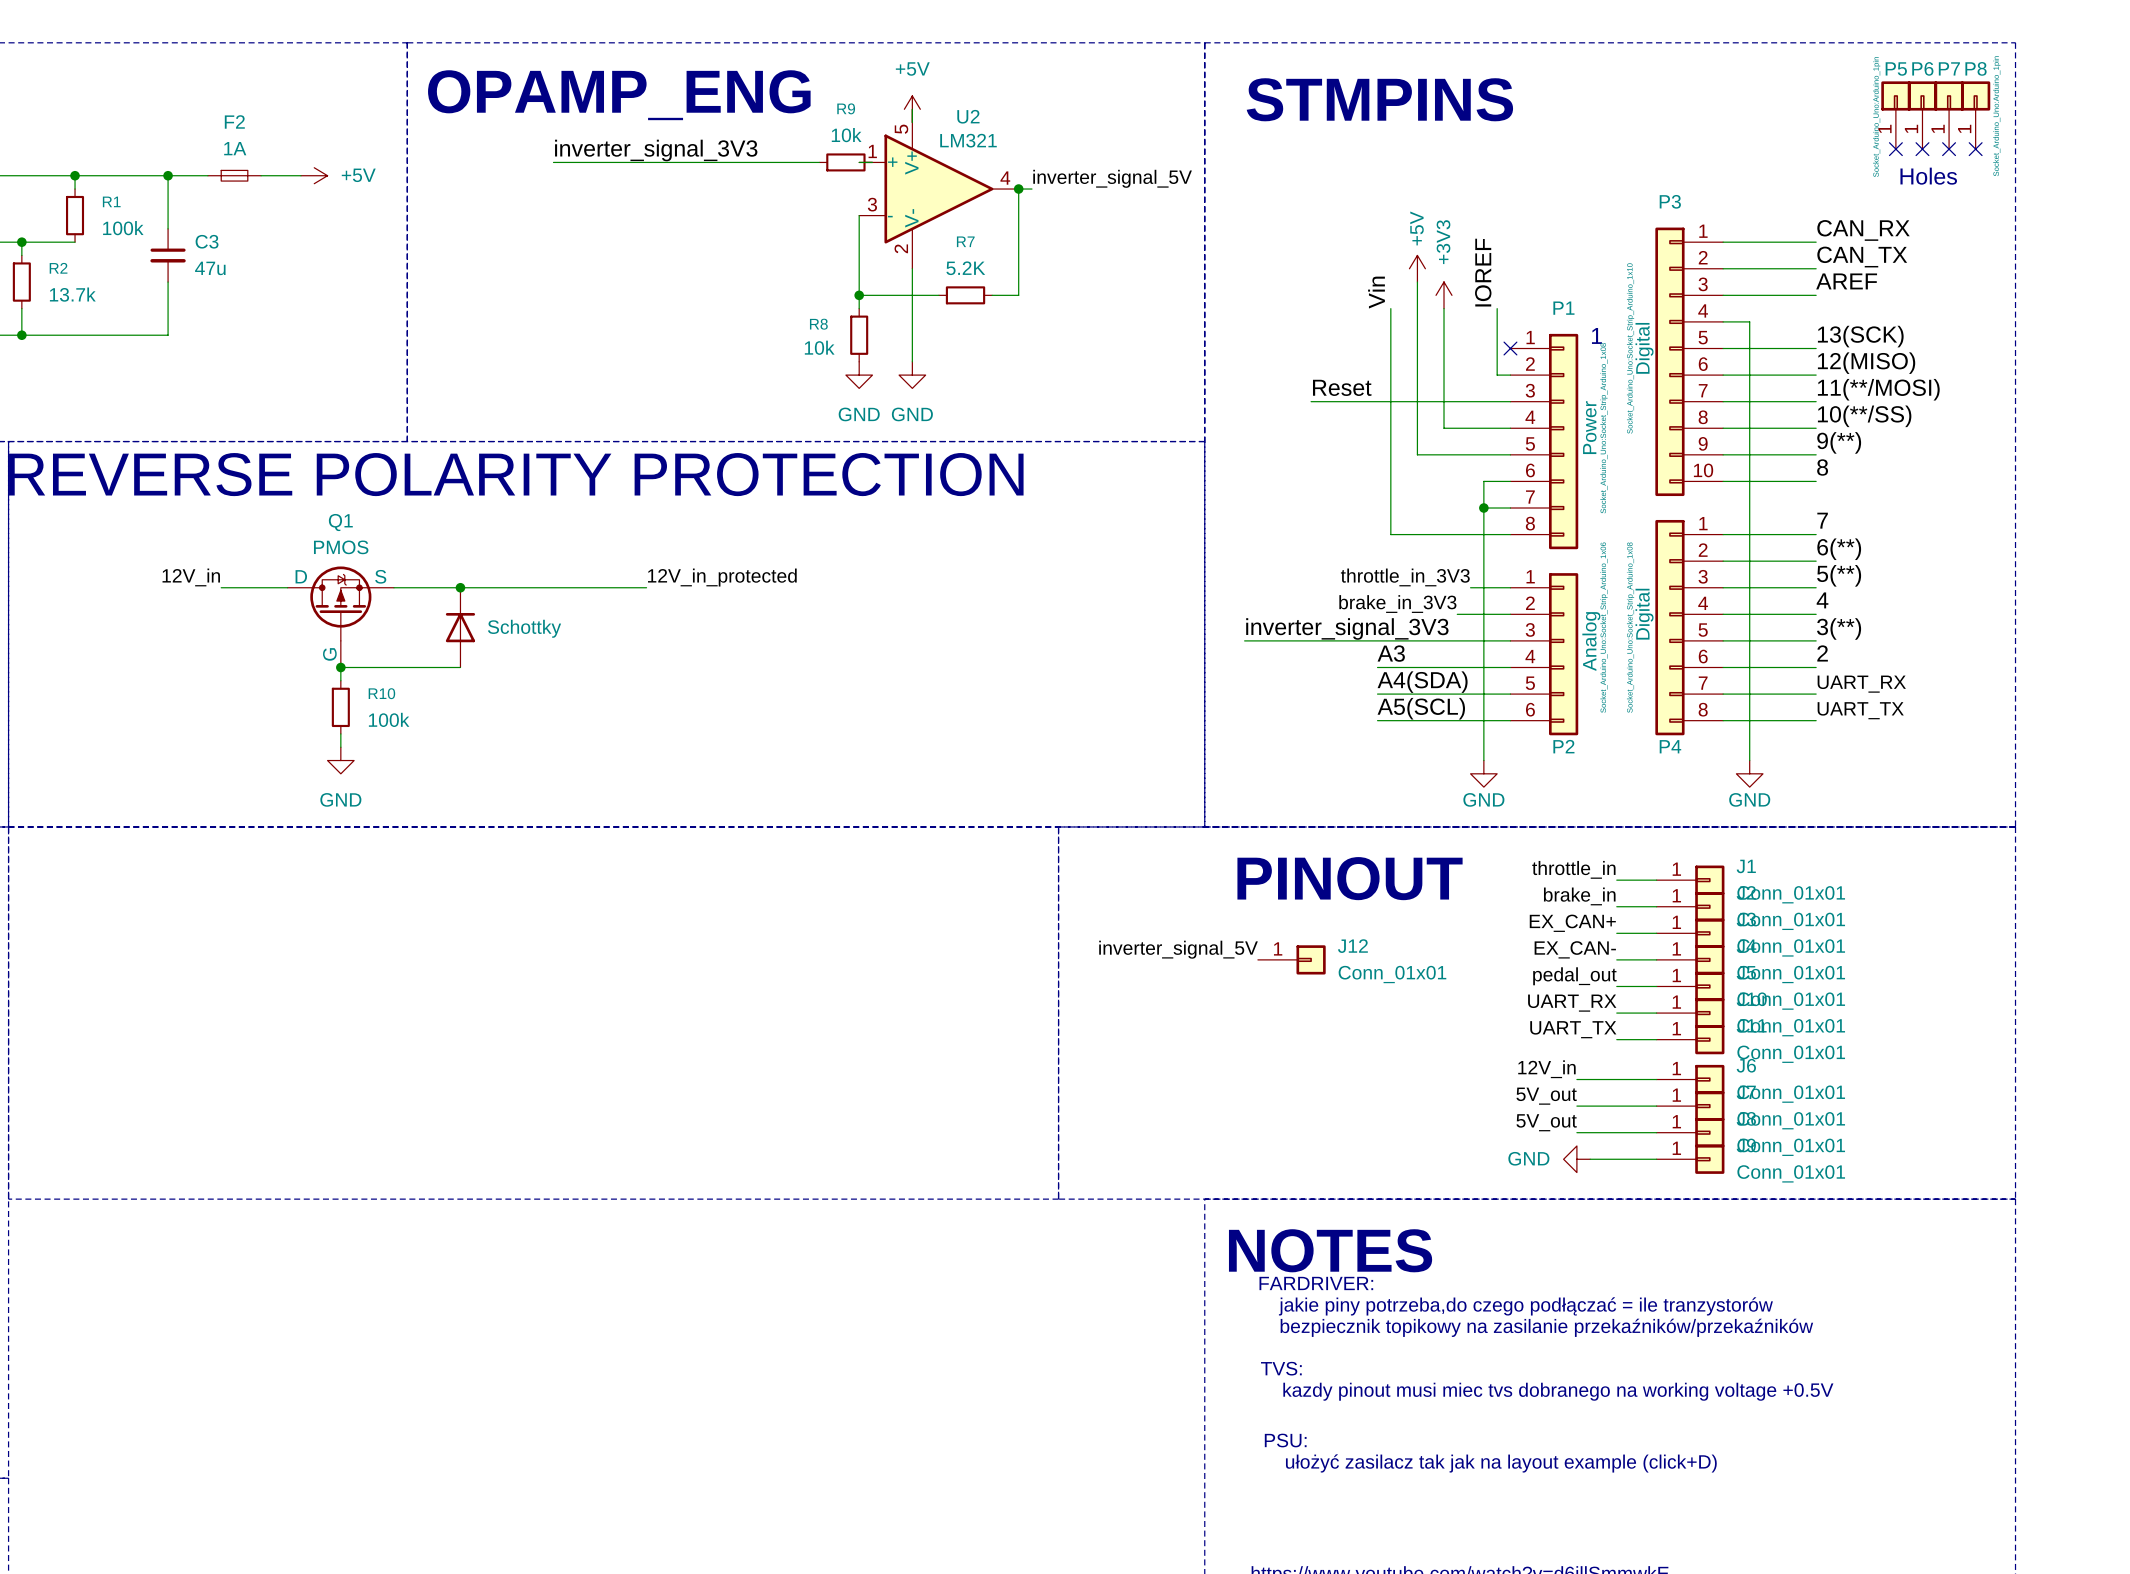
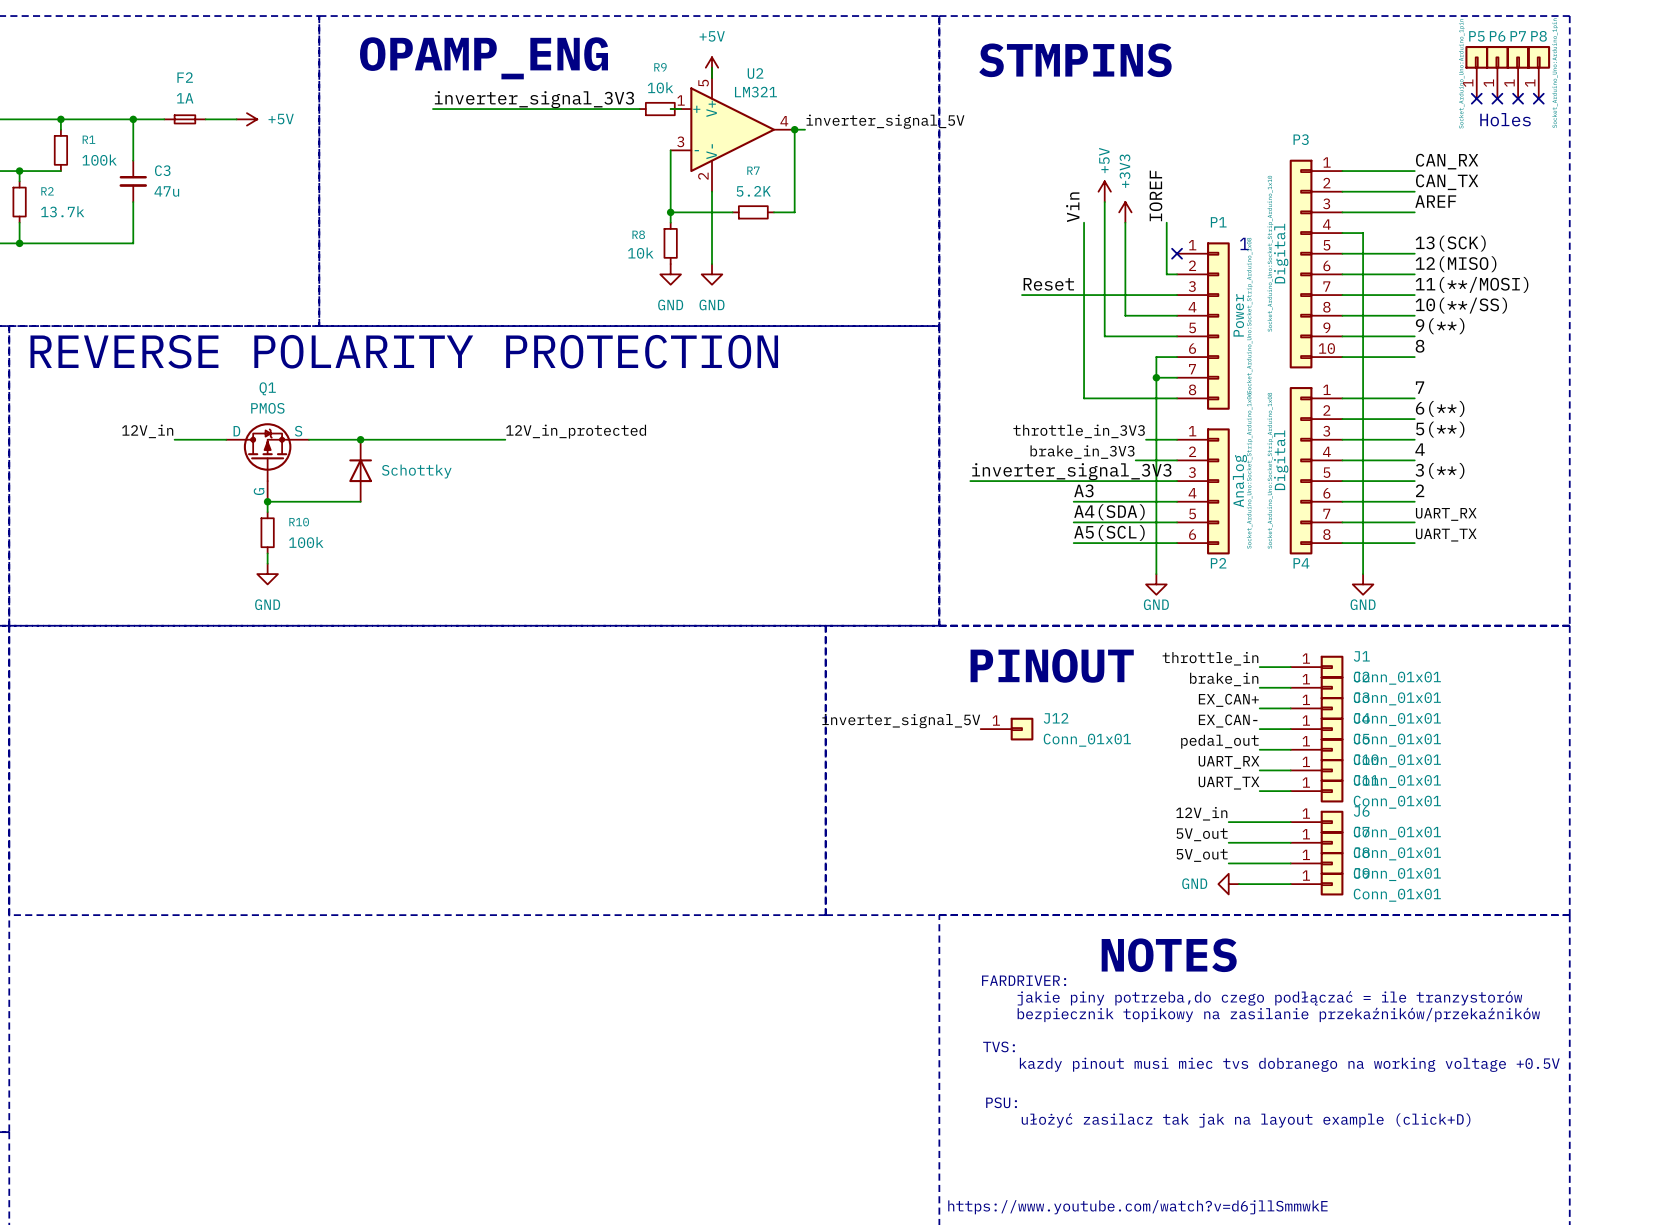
text position: NOTES (1330, 1250) -> NOTES (1169, 955)

